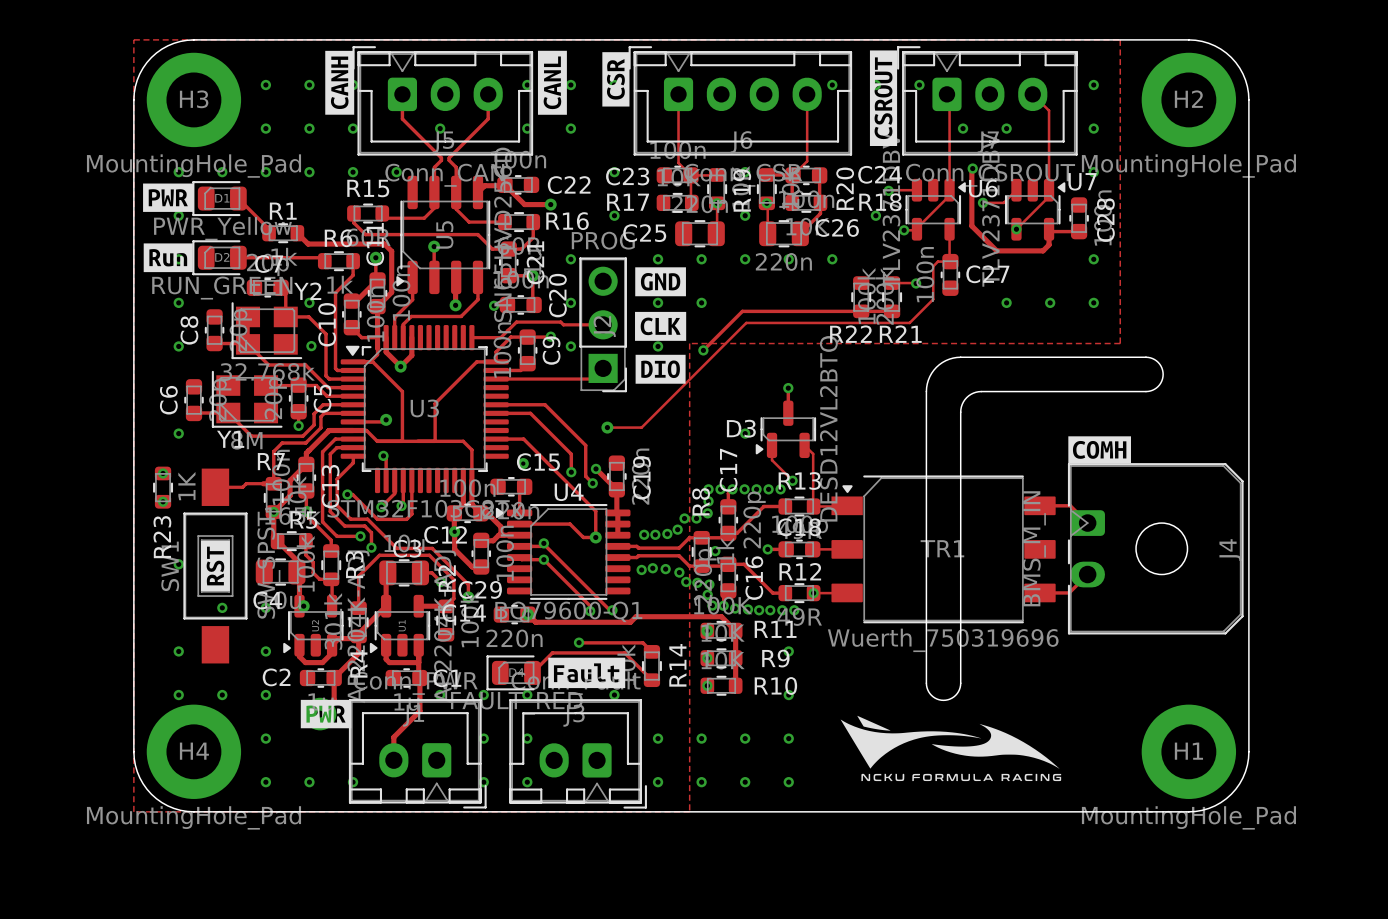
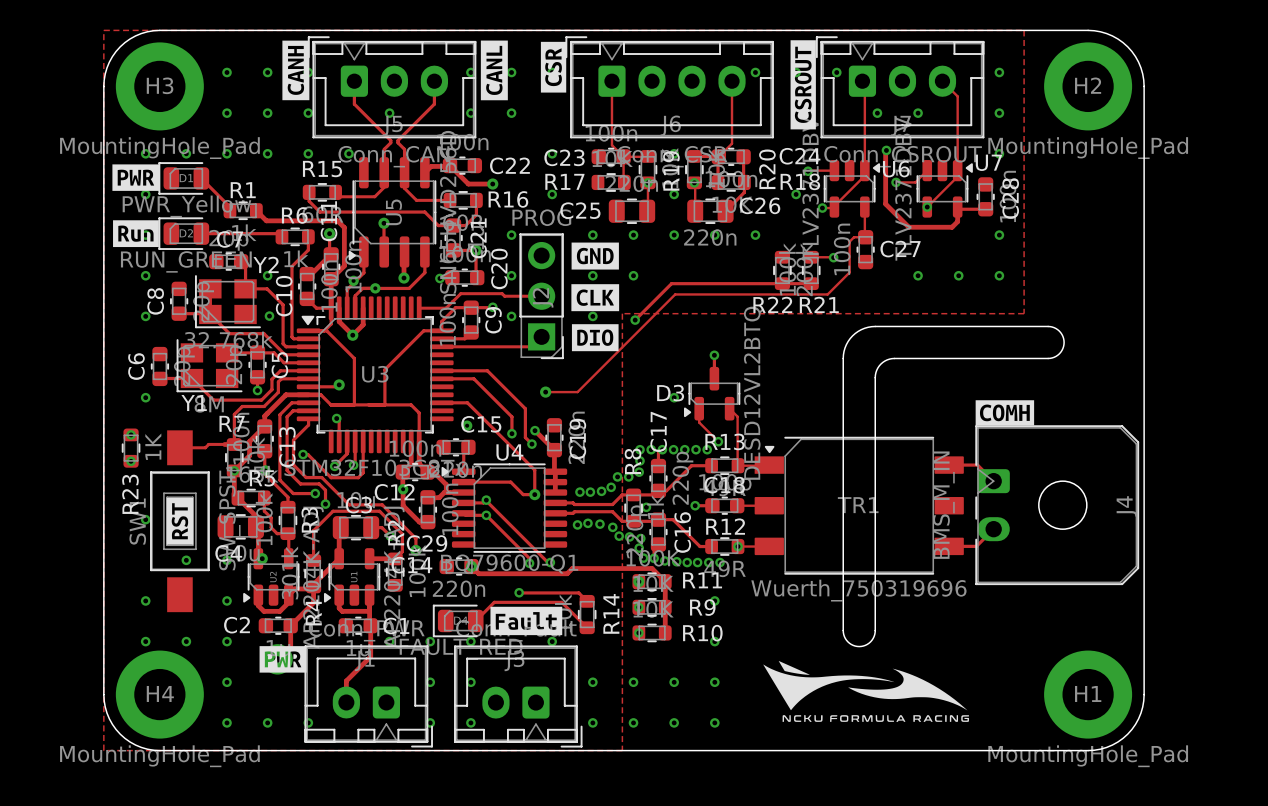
via: none -> (353, 280)
via: none -> (375, 288)

